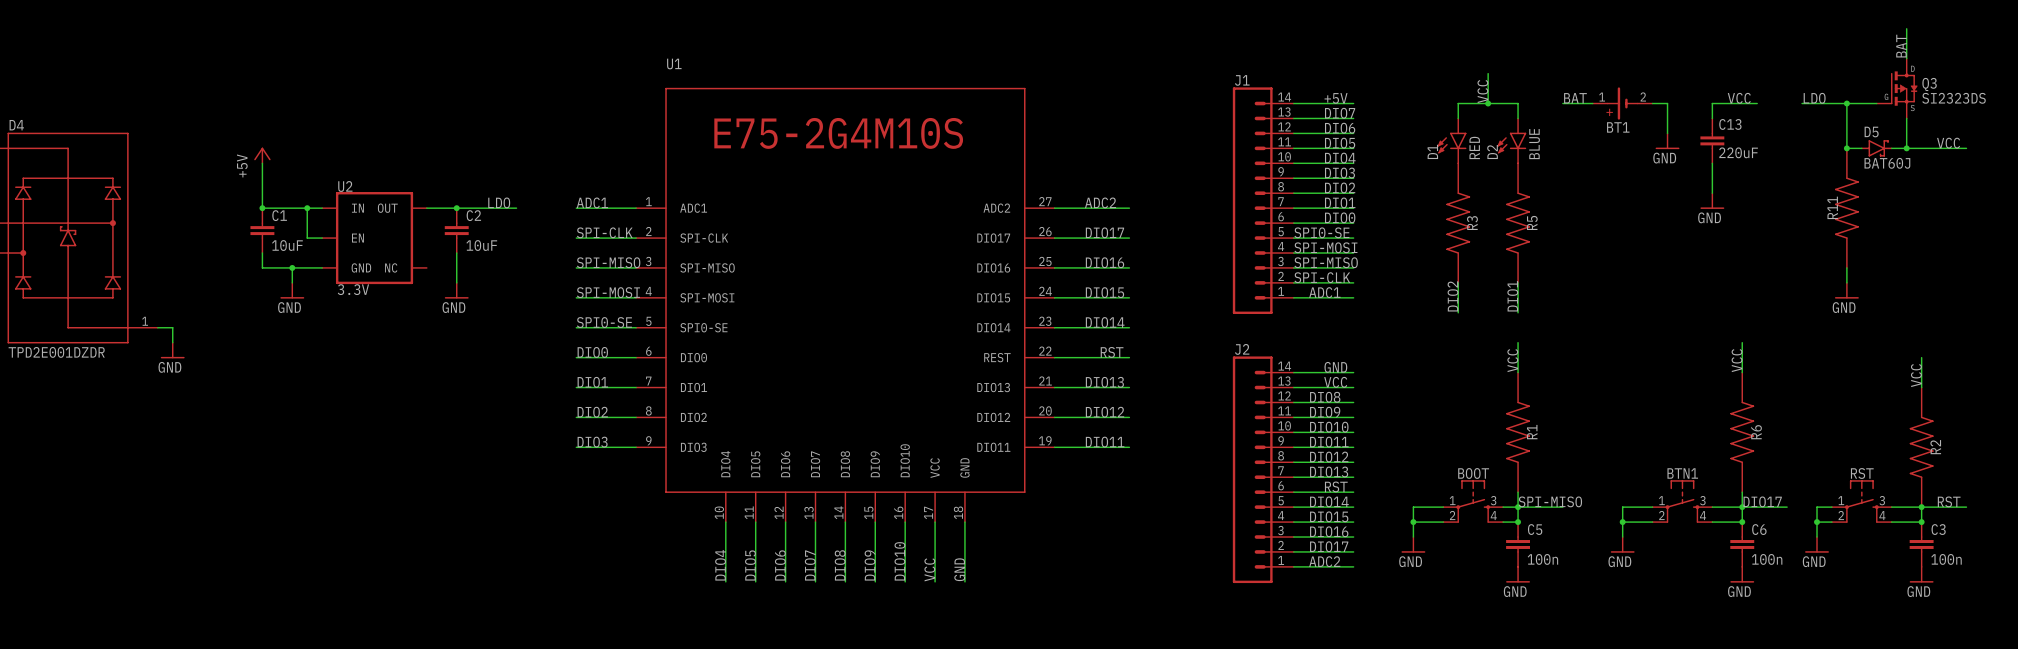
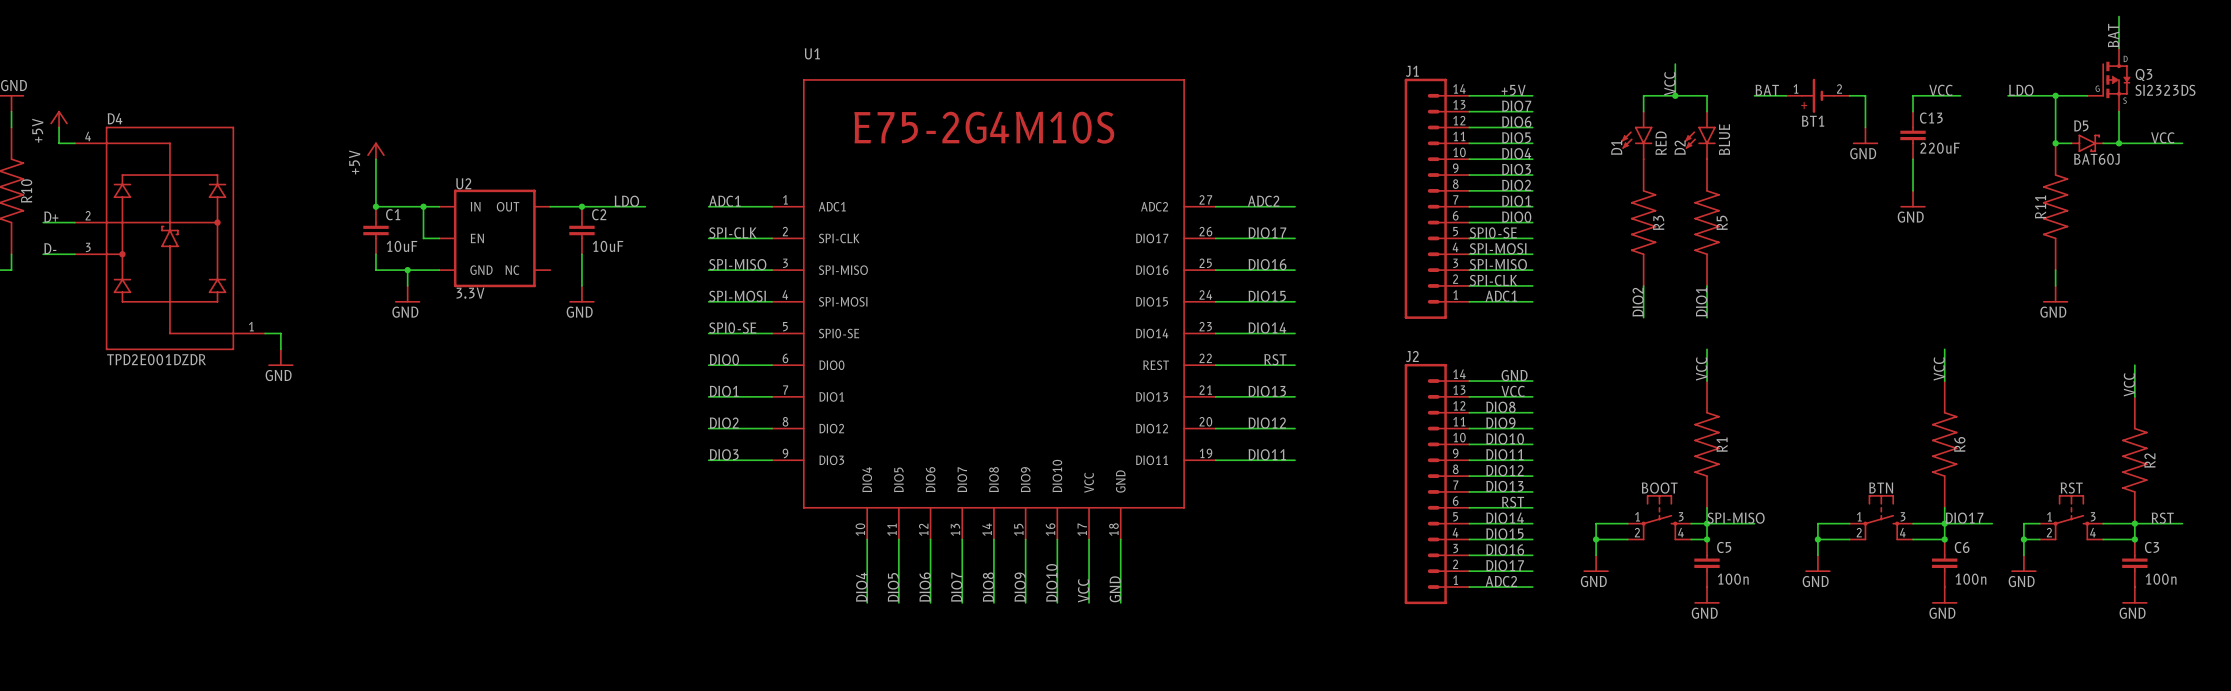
BTN1 name: BTN1 (1682, 473) -> BTN (1881, 487)

